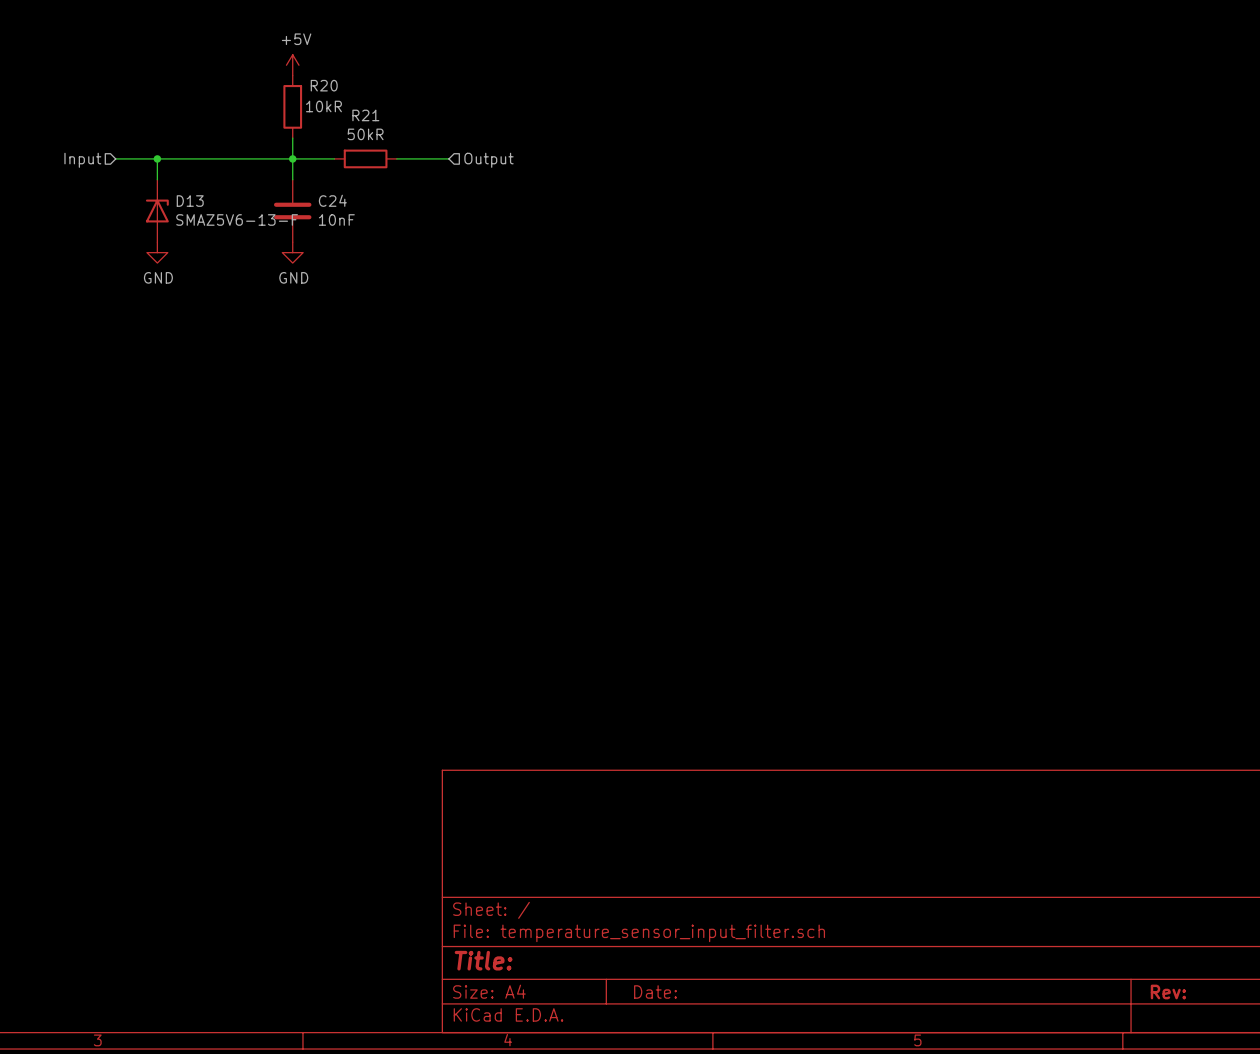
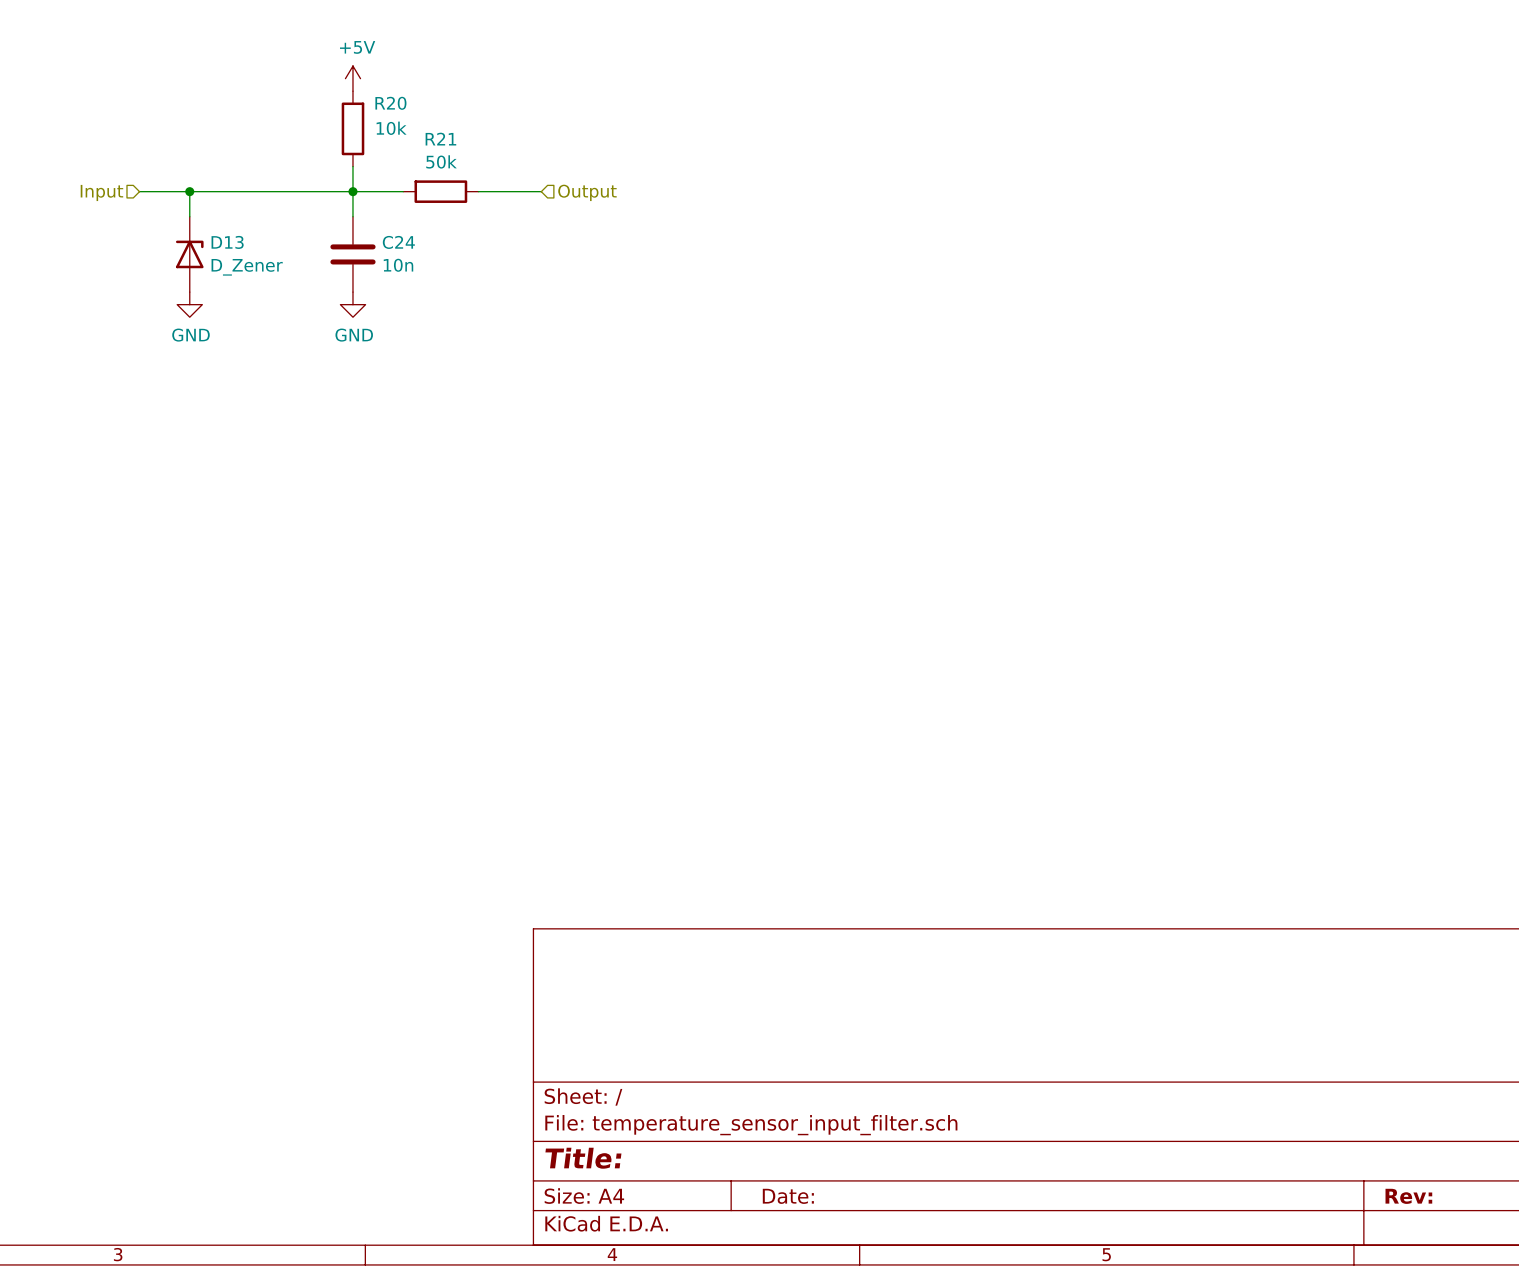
R20 value: 10kR (323, 106) -> 10k (391, 128)
R21 value: 50kR (365, 134) -> 50k (441, 161)
D13 value: SMAZ5V6-13-F (237, 219) -> D_Zener (247, 267)
C24 value: 10nF (336, 219) -> 10n (398, 265)

